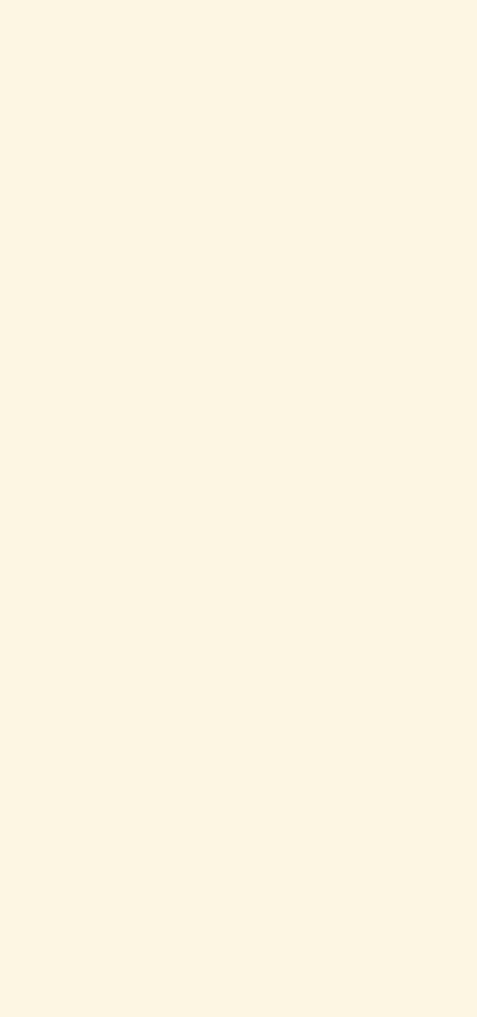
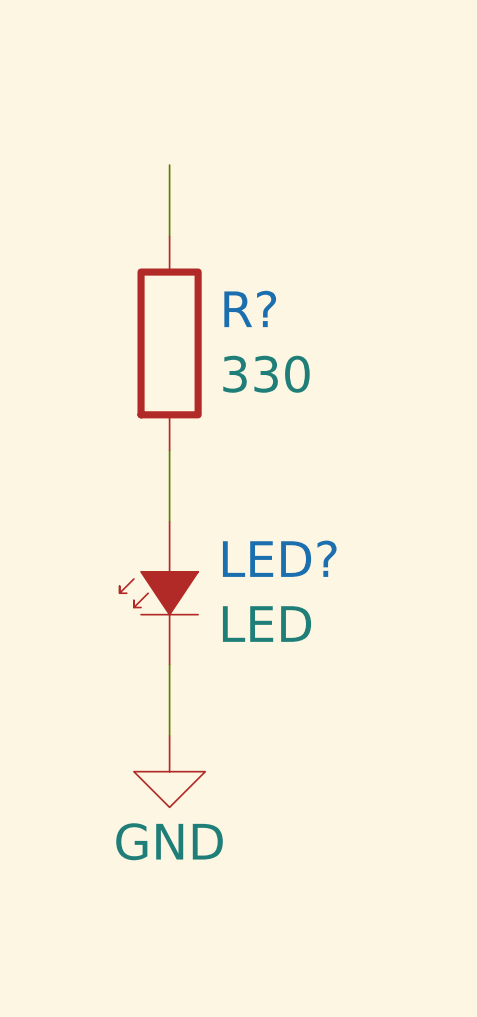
wire: none -> (169, 165) (169, 236)
R?: none -> 330 (169, 343)
wire: none -> (169, 450) (169, 521)
LED?: none -> LED (158, 593)
wire: none -> (169, 664) (169, 735)
power symbol: none -> GND (169, 771)

